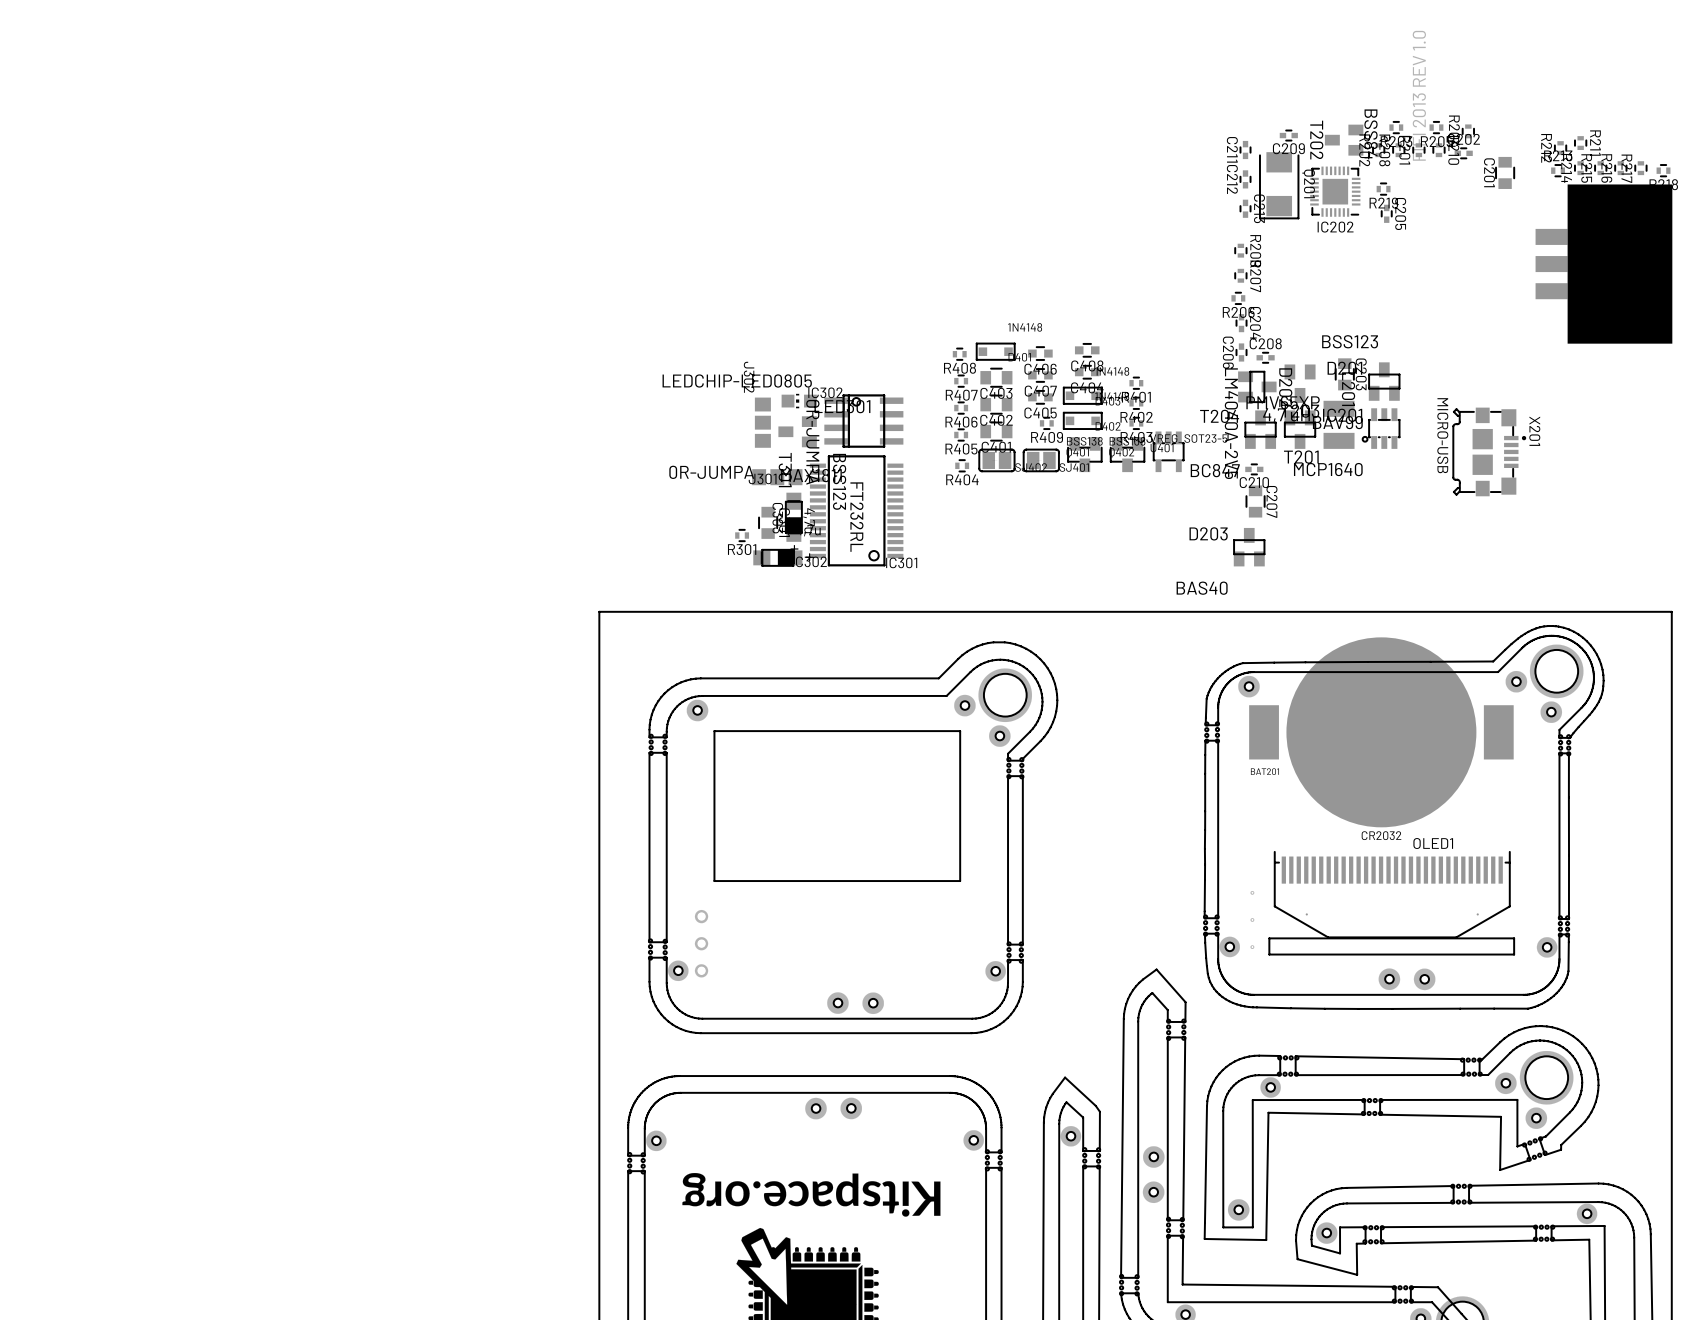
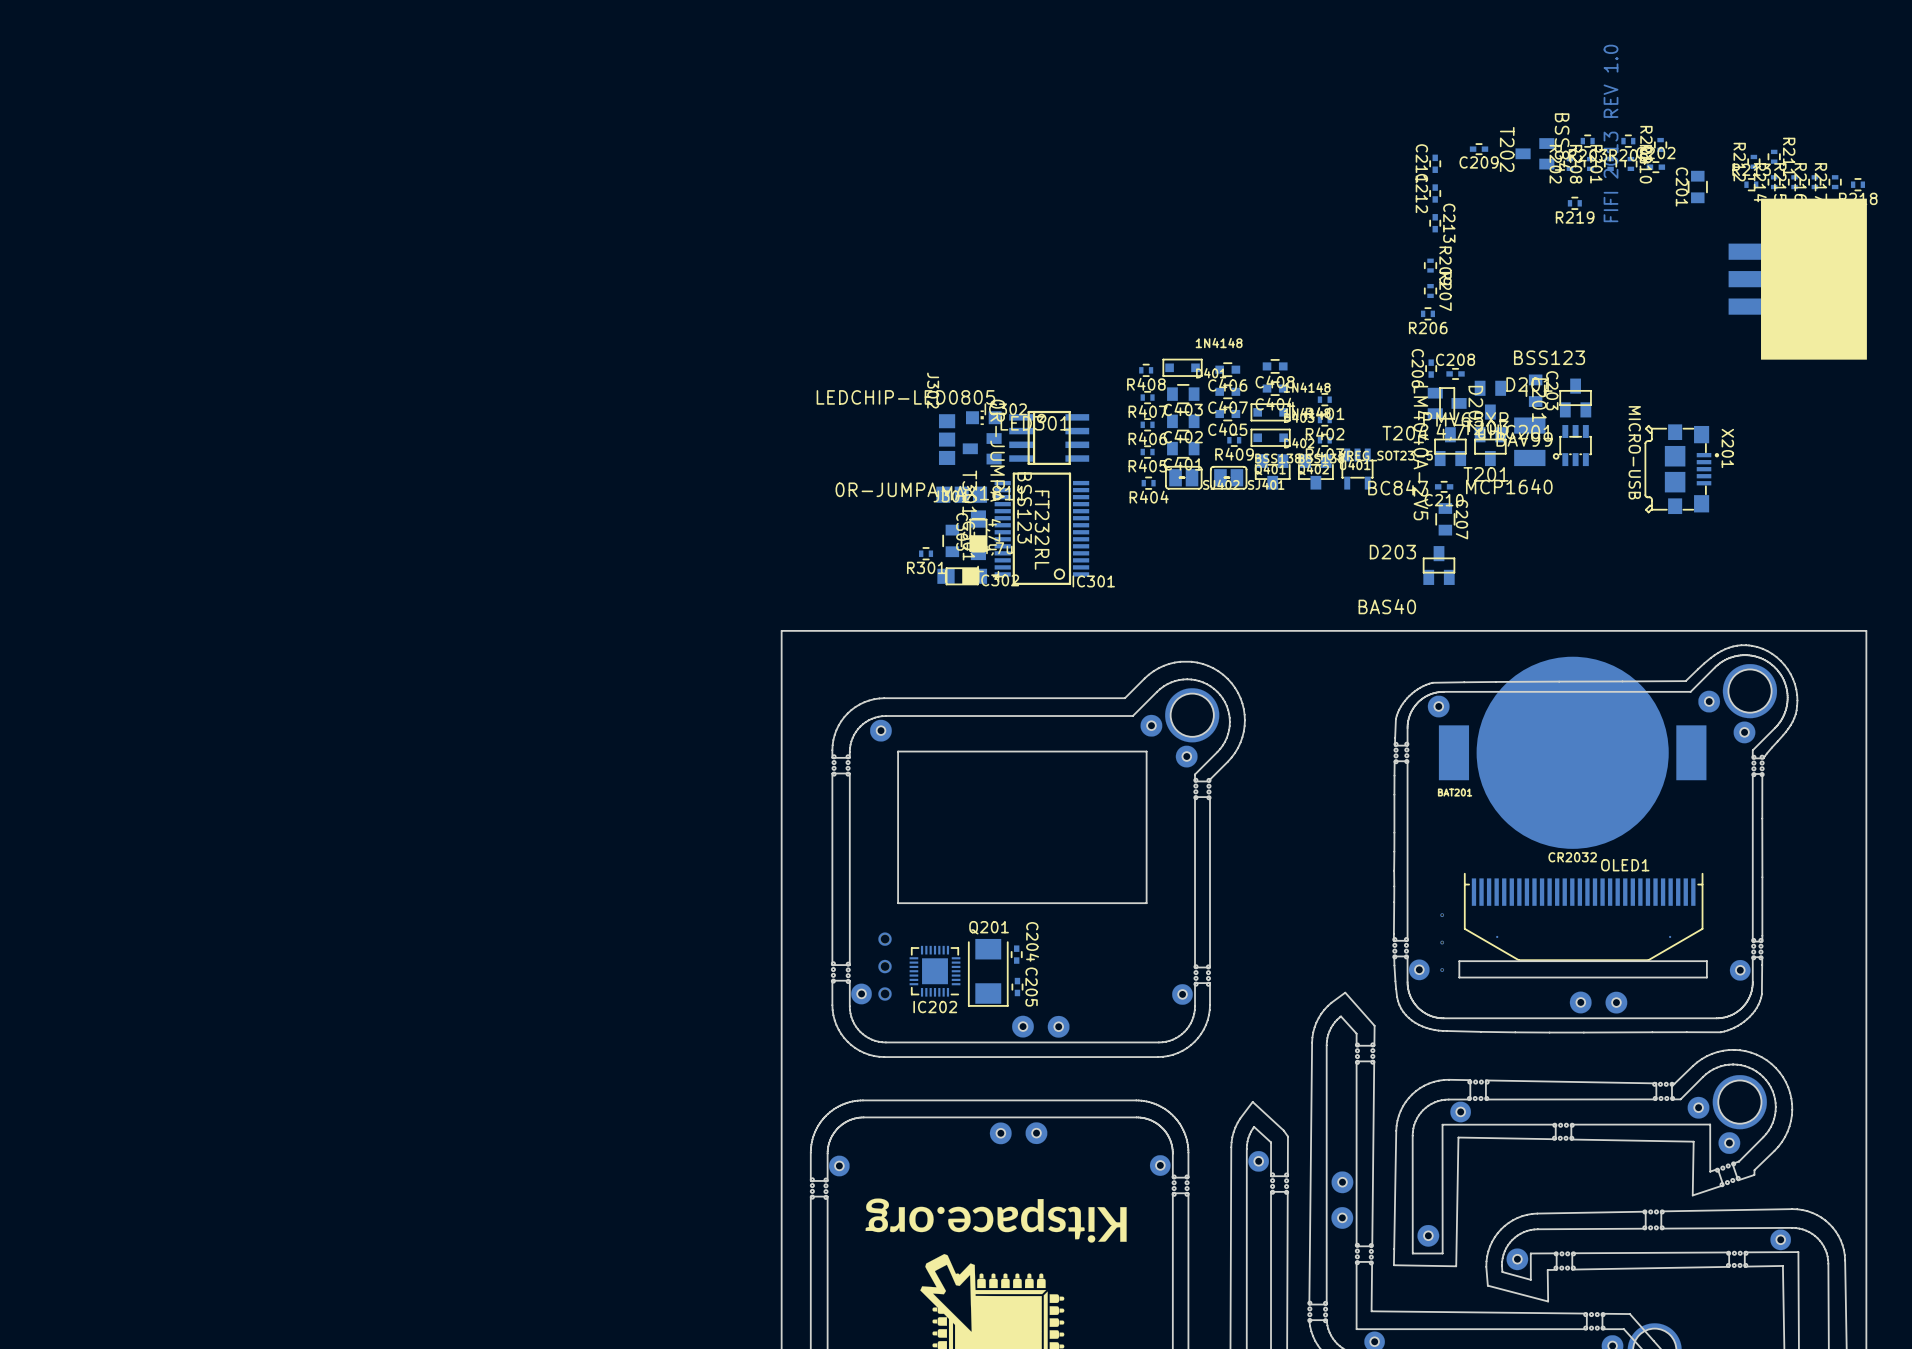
Q201 name rotation: 0° (1308, 183) -> 90° counterclockwise (989, 927)
Q201 name position: Q201 (1308, 183) -> Q201 (989, 927)
Q201 position: (1279, 185) -> (988, 972)
IC202 position: (1335, 191) -> (935, 971)
C205 position: (1386, 213) -> (1017, 987)
C204 position: (1241, 323) -> (1016, 954)
C204 name position: C204 (1255, 323) -> C204 (1032, 941)

